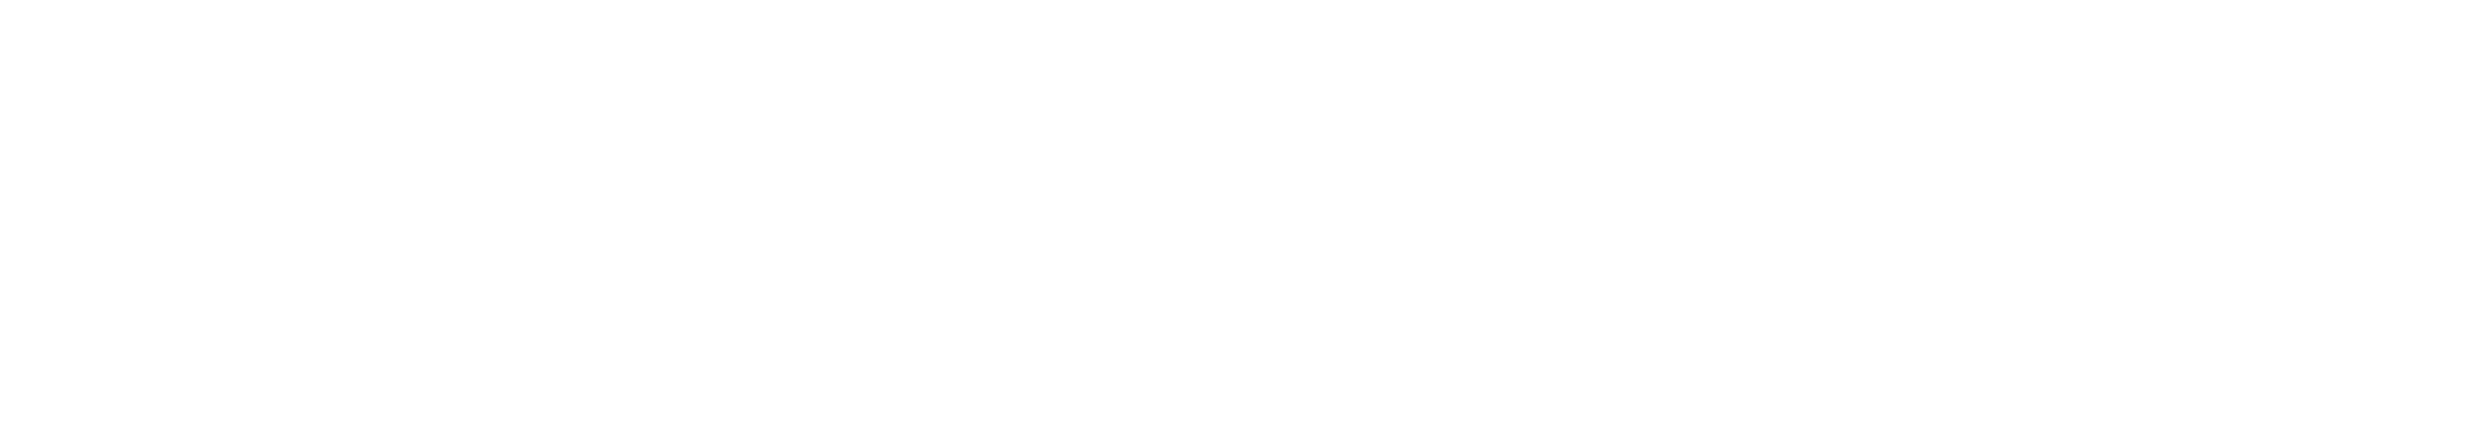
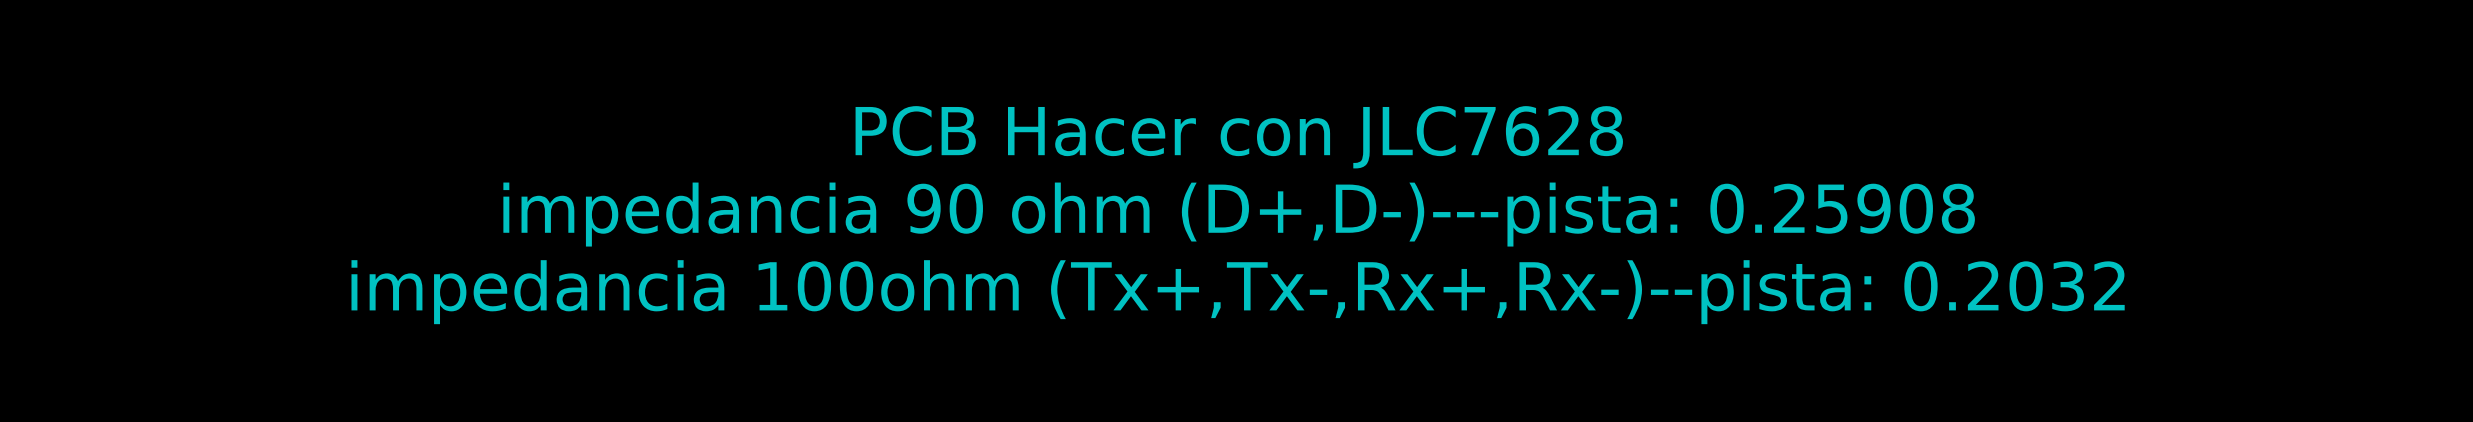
text: none -> PCB Hacer con JLC7628 (1239, 137)
text: none -> impedancia 90 ohm (D+,D-)---pista: 0.25908 (1239, 214)
text: none -> impedancia 100ohm (Tx+,Tx-,Rx+,Rx-)--pista: 0.2032 (1238, 292)

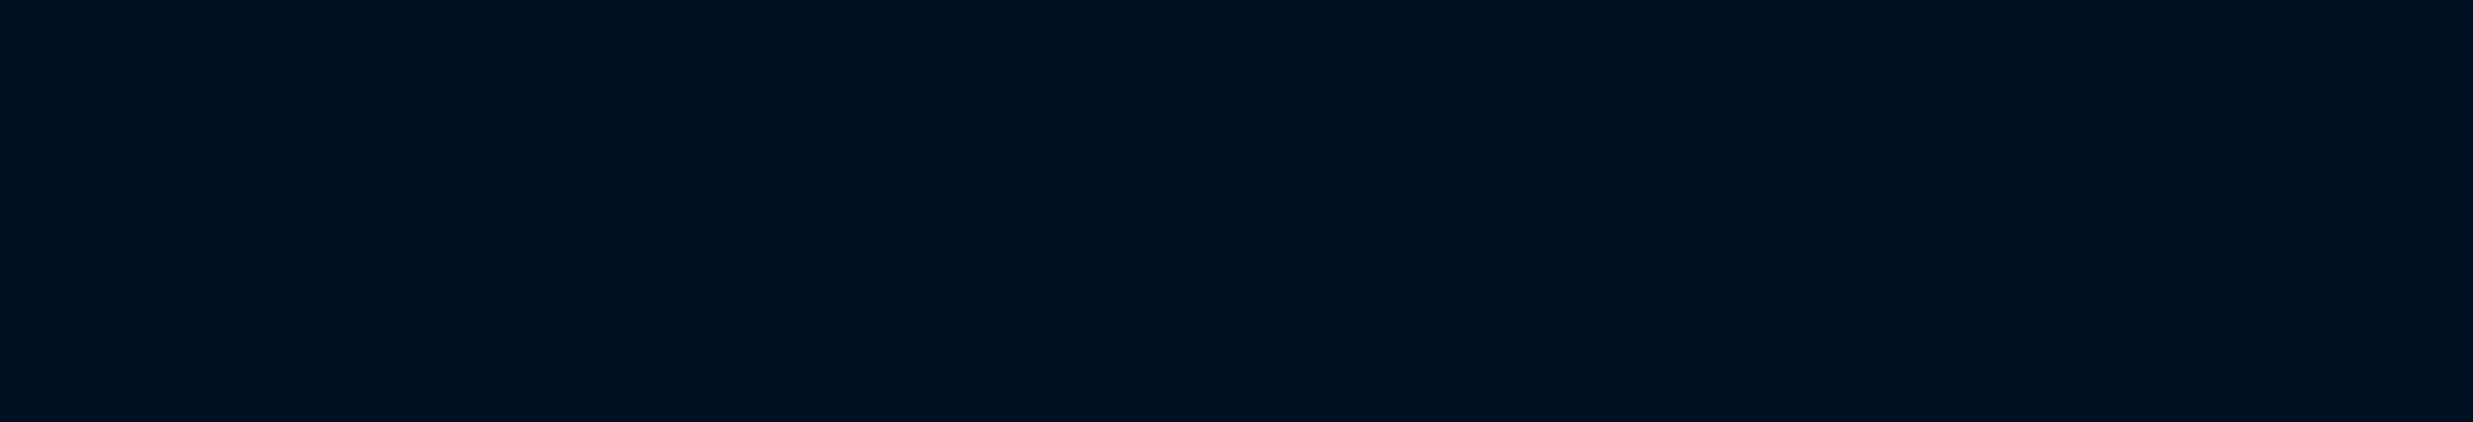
text: PCB Hacer con JLC7628 (1239, 137) -> none
text: impedancia 90 ohm (D+,D-)---pista: 0.25908 (1239, 214) -> none
text: impedancia 100ohm (Tx+,Tx-,Rx+,Rx-)--pista: 0.2032 (1238, 292) -> none

